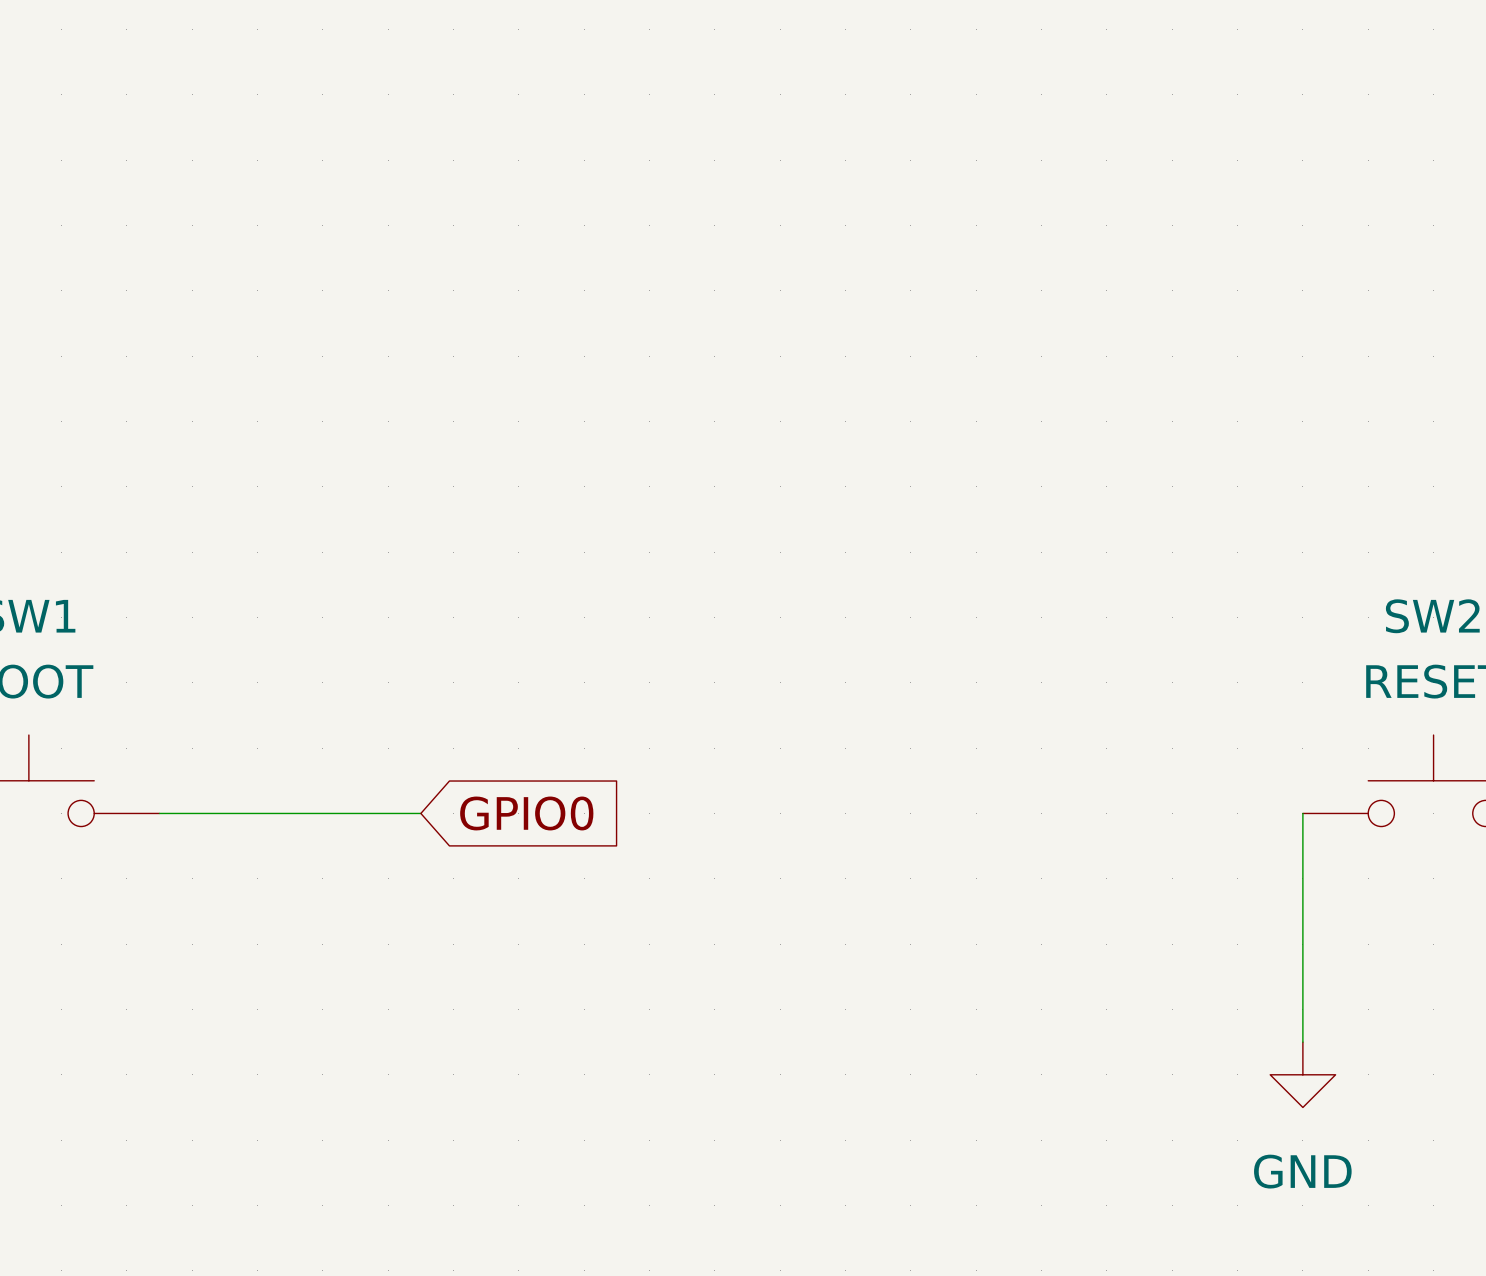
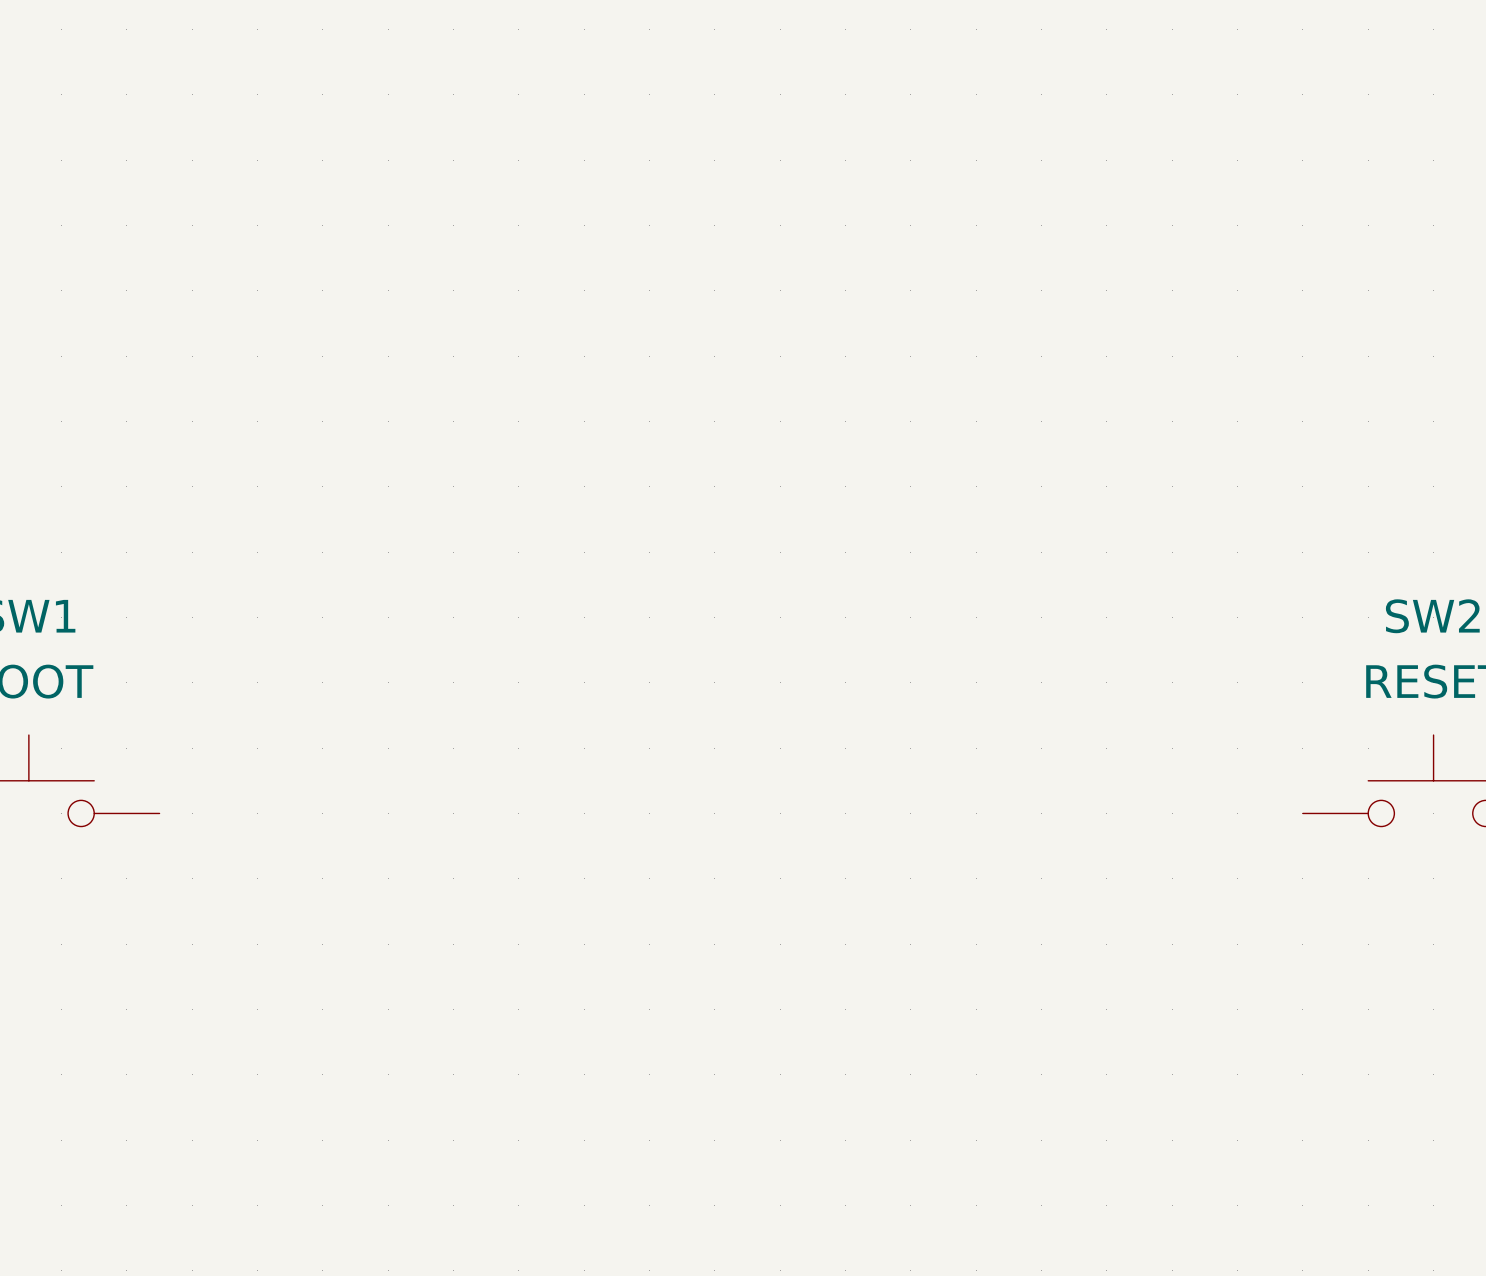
wire: (159, 813) (420, 813) -> none
global label: GPIO0 (526, 813) -> none
wire: (1302, 813) (1302, 1042) -> none
power symbol: GND (1302, 1074) -> none

